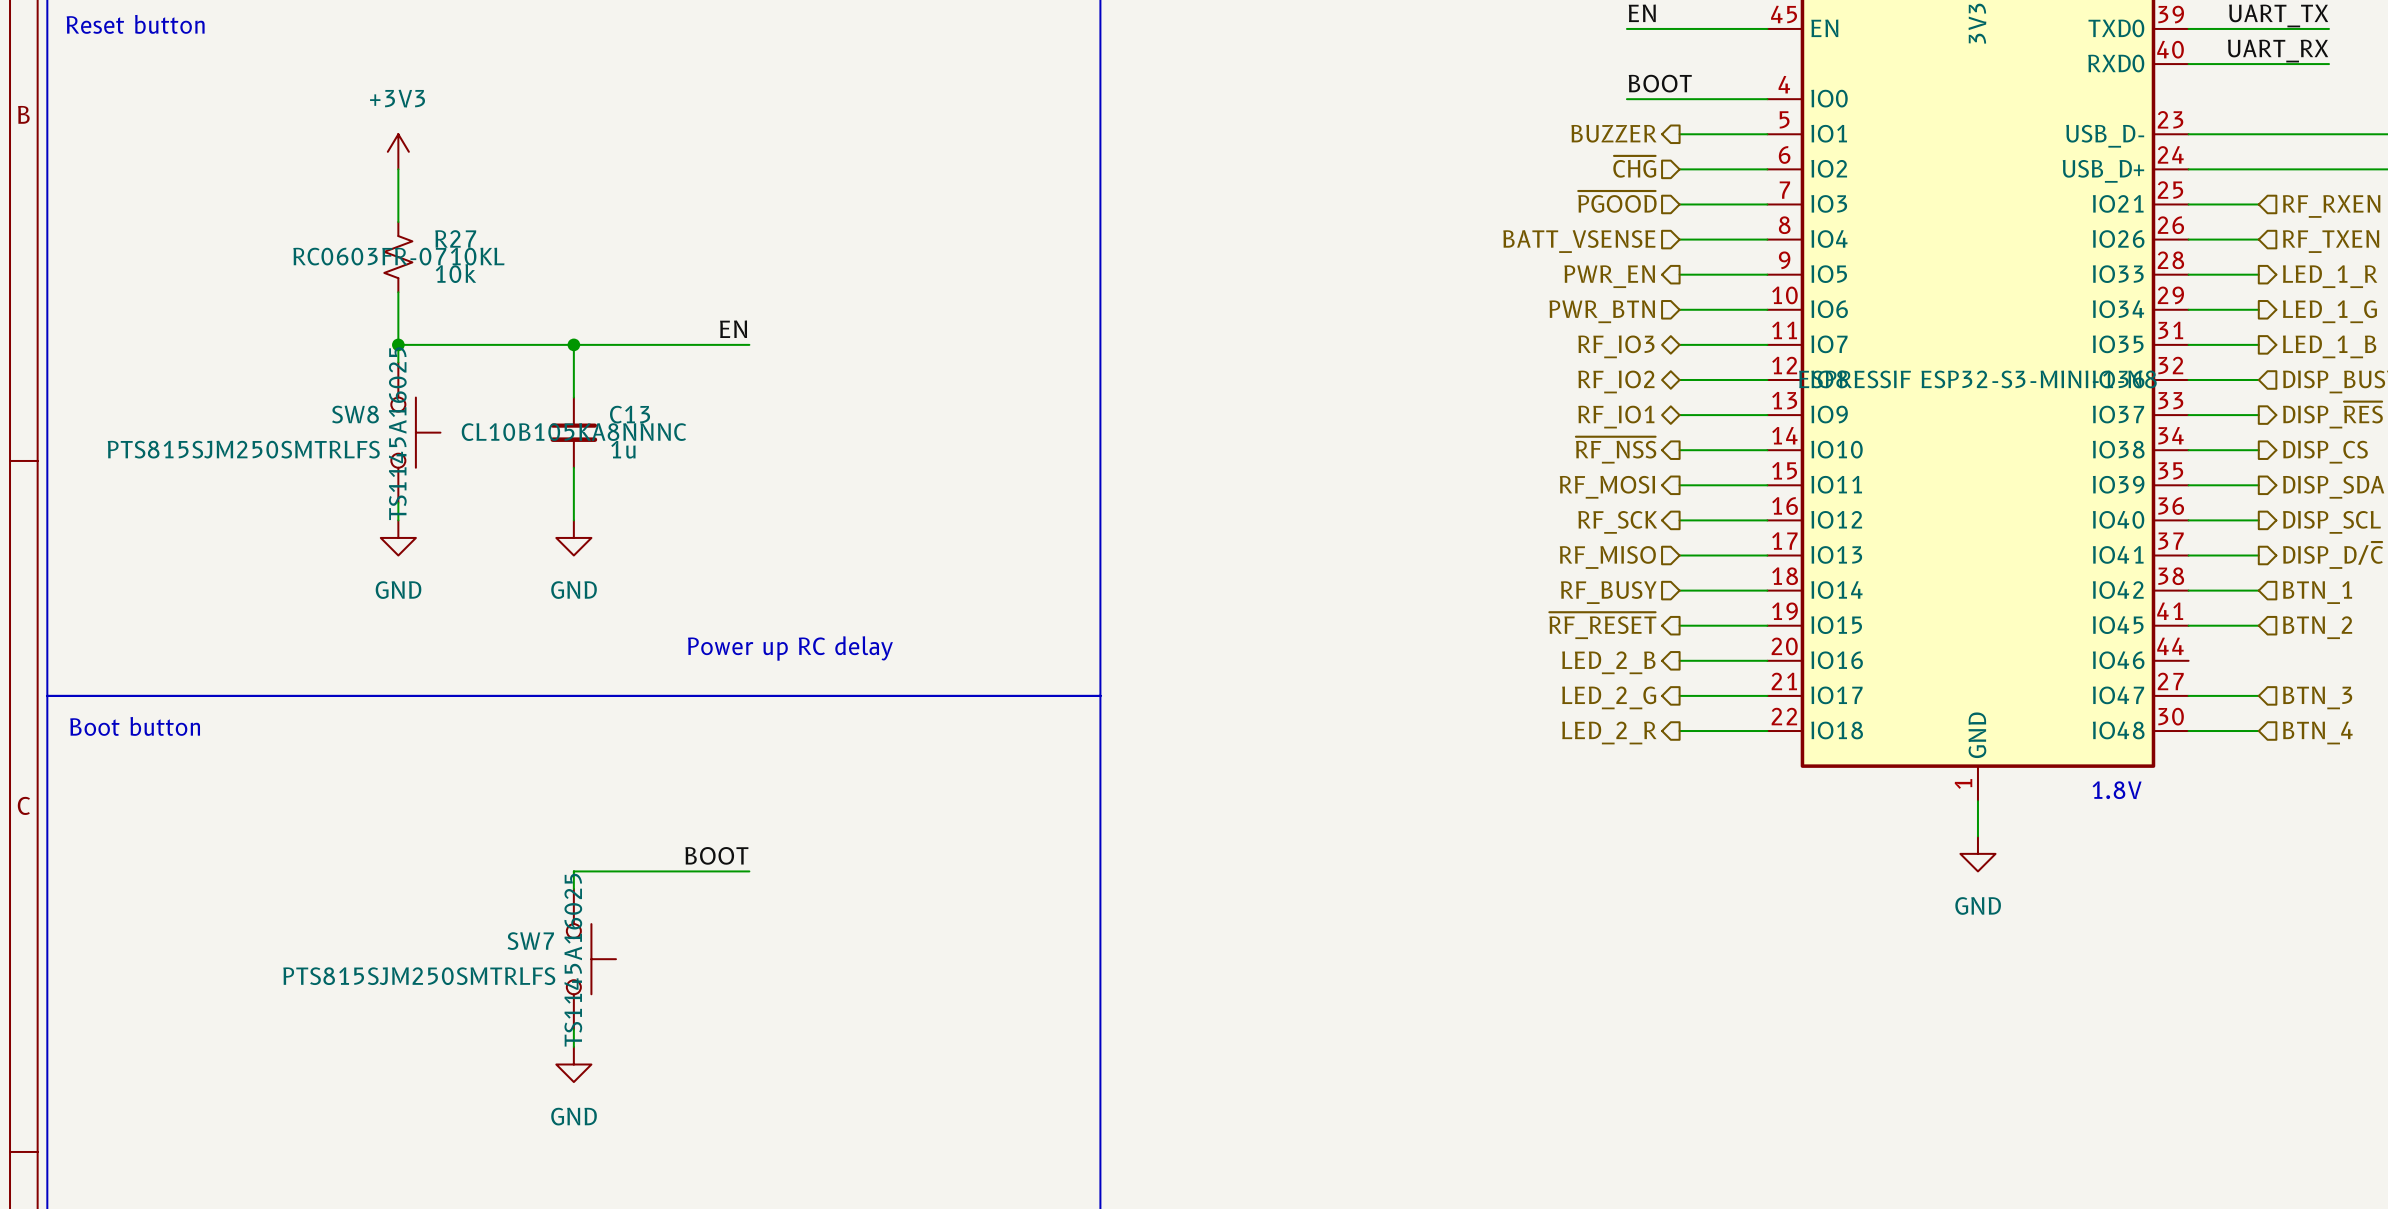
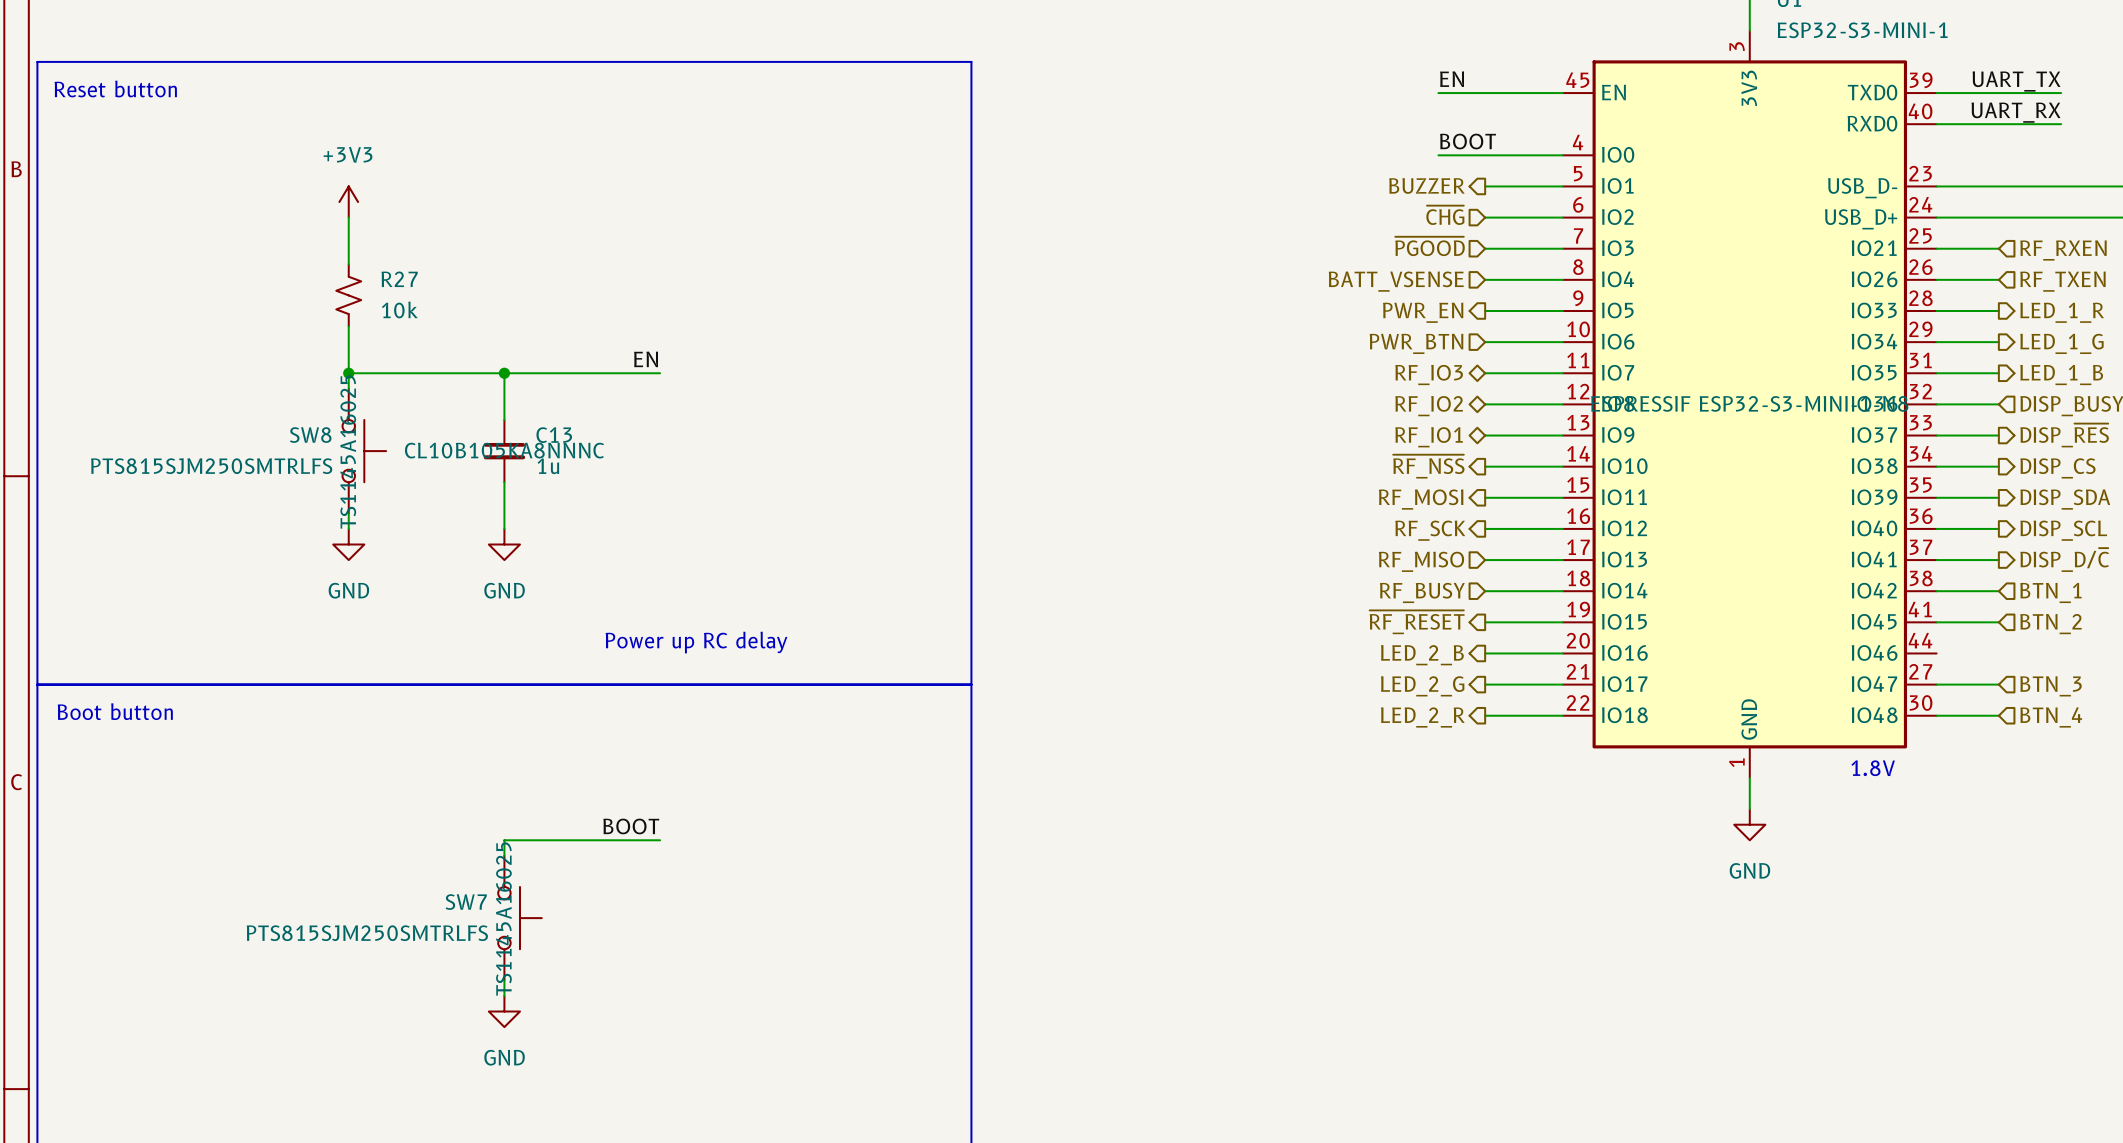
R27 text: RC0603FR-0710KL (398, 256) -> none

